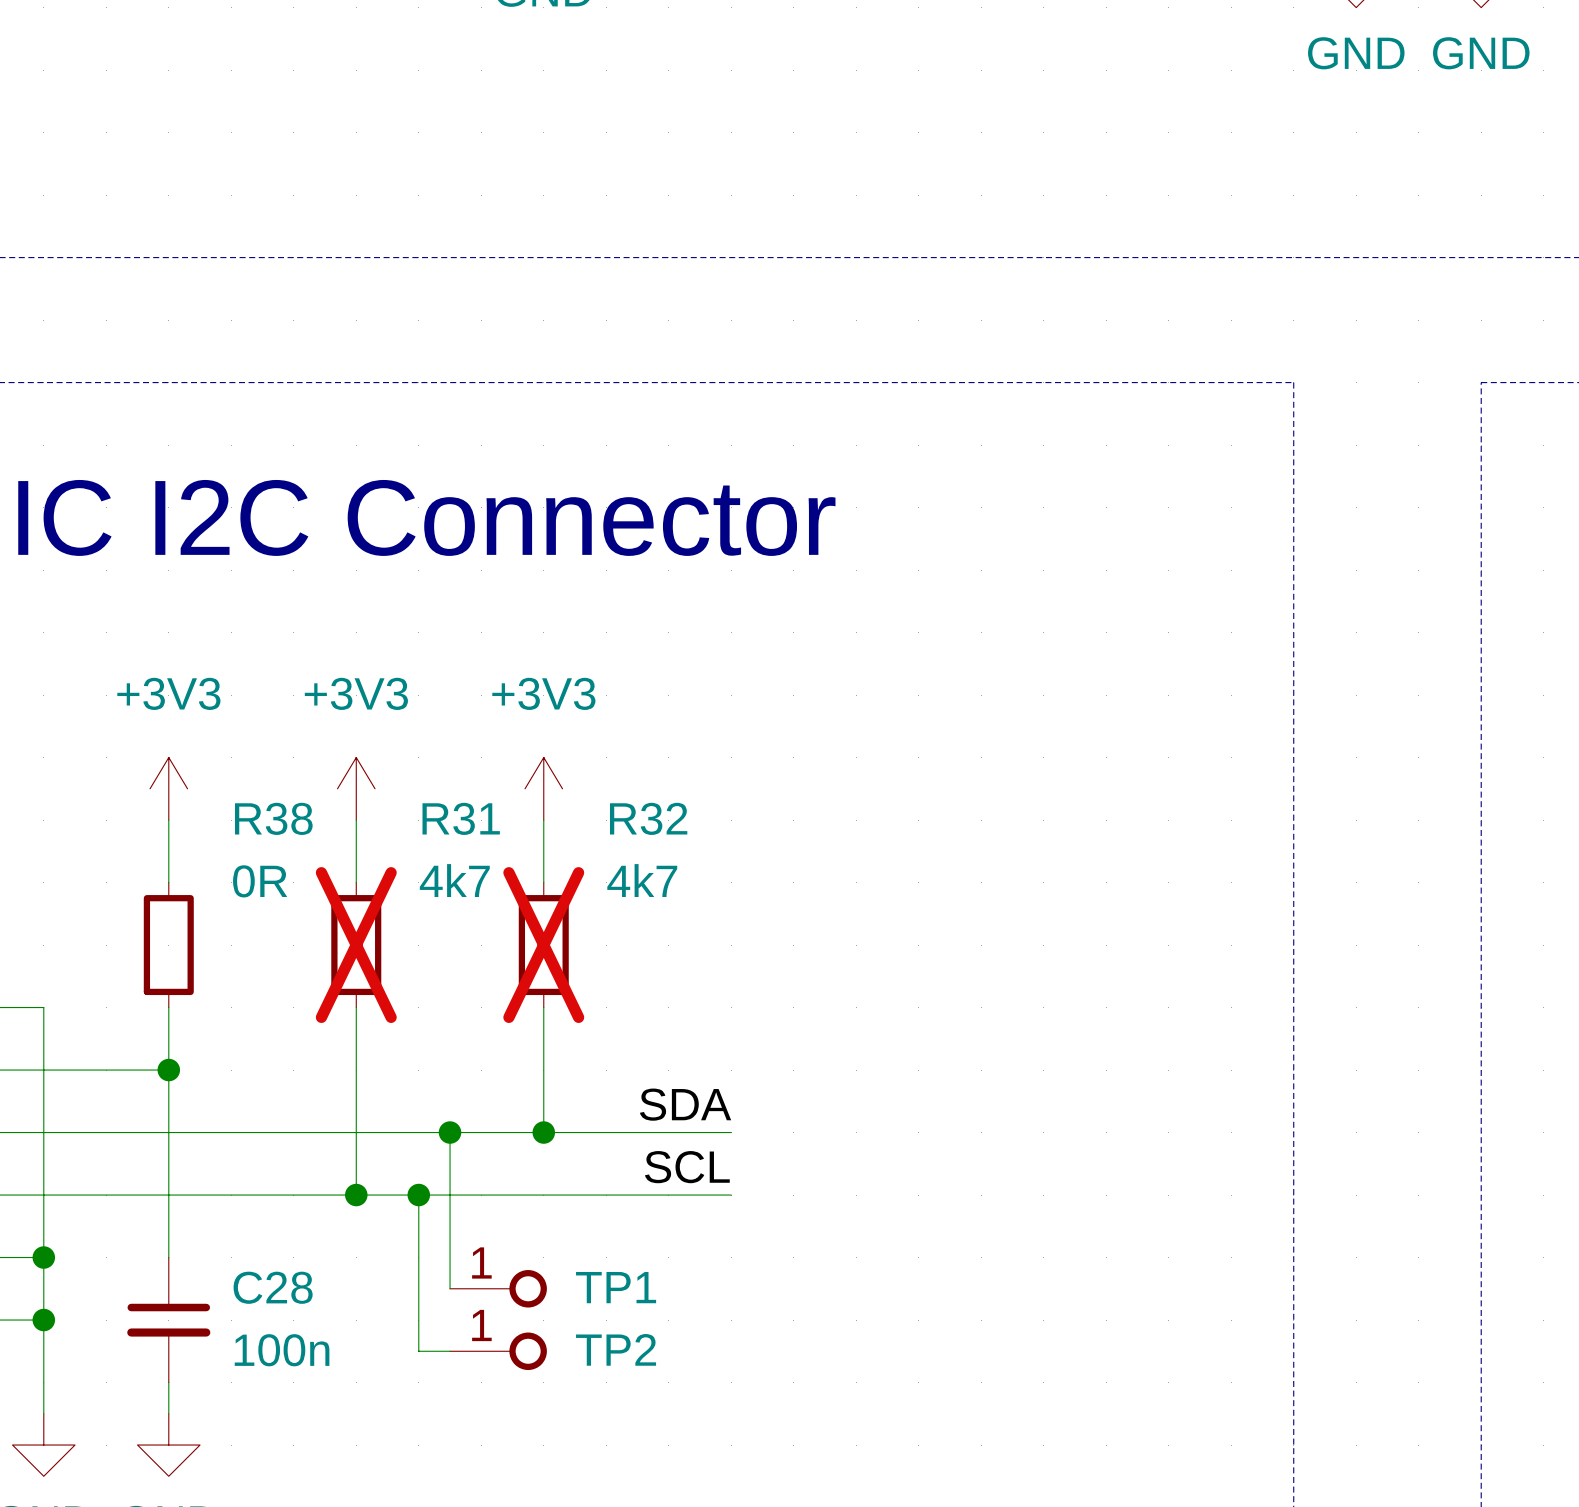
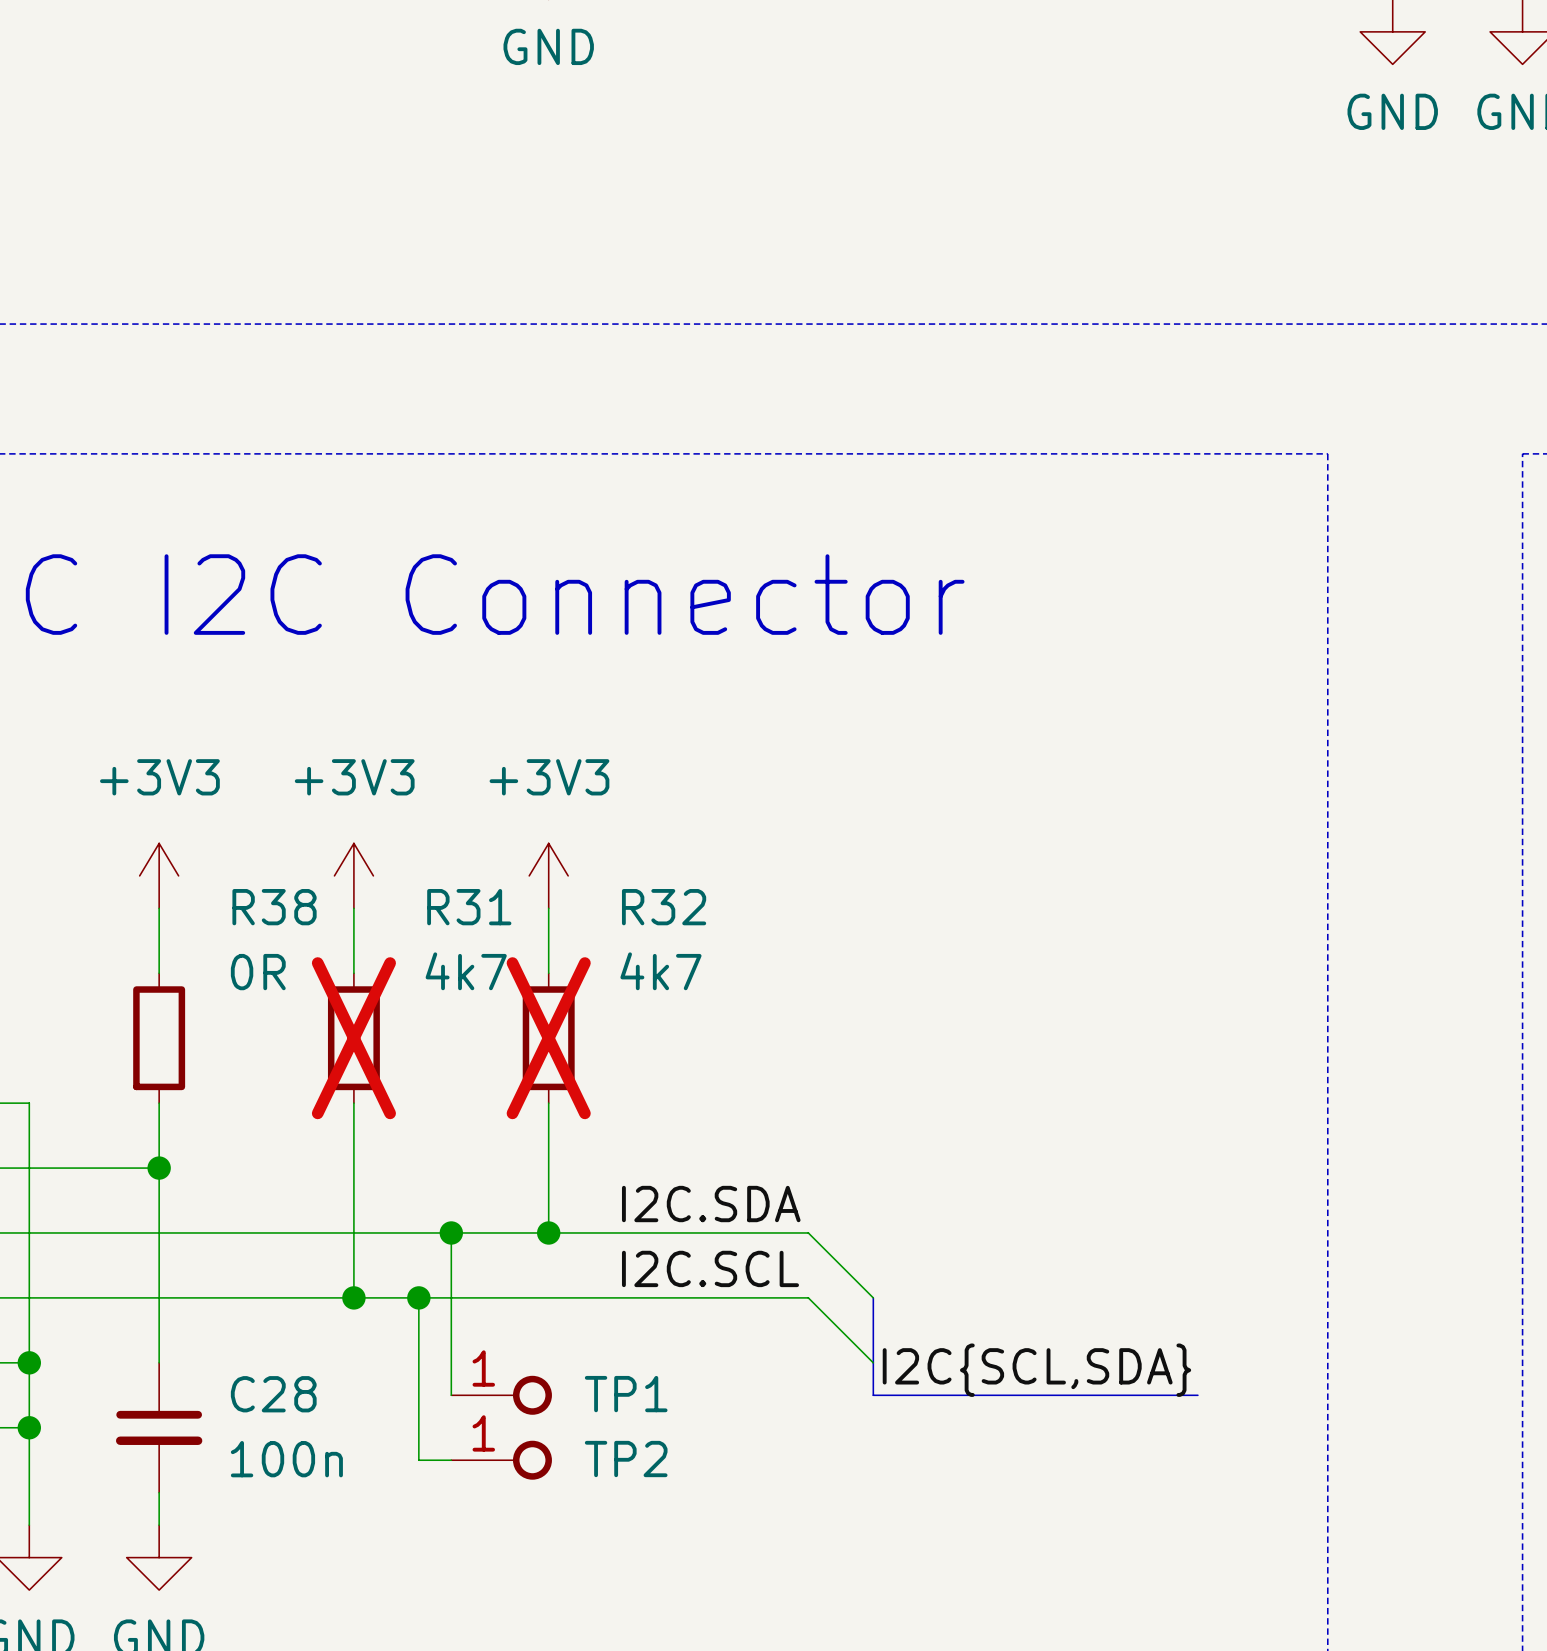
label: SDA (685, 1104) -> none
label: none -> I2C.SDA (711, 1204)
wire: none -> (743, 1232) (808, 1232) (873, 1297)
label: SCL (687, 1167) -> none
label: none -> I2C.SCL (710, 1268)
wire: none -> (743, 1297) (808, 1297) (873, 1362)
bus: none -> (873, 1297) (873, 1395) (1197, 1395)
label: none -> I2C{SCL,SDA} (1036, 1370)

